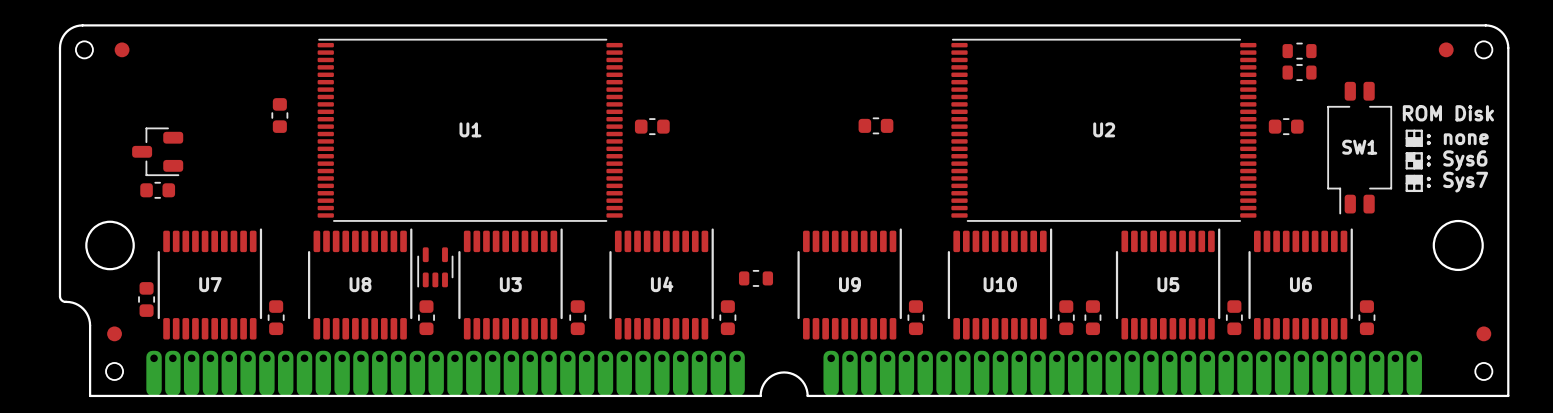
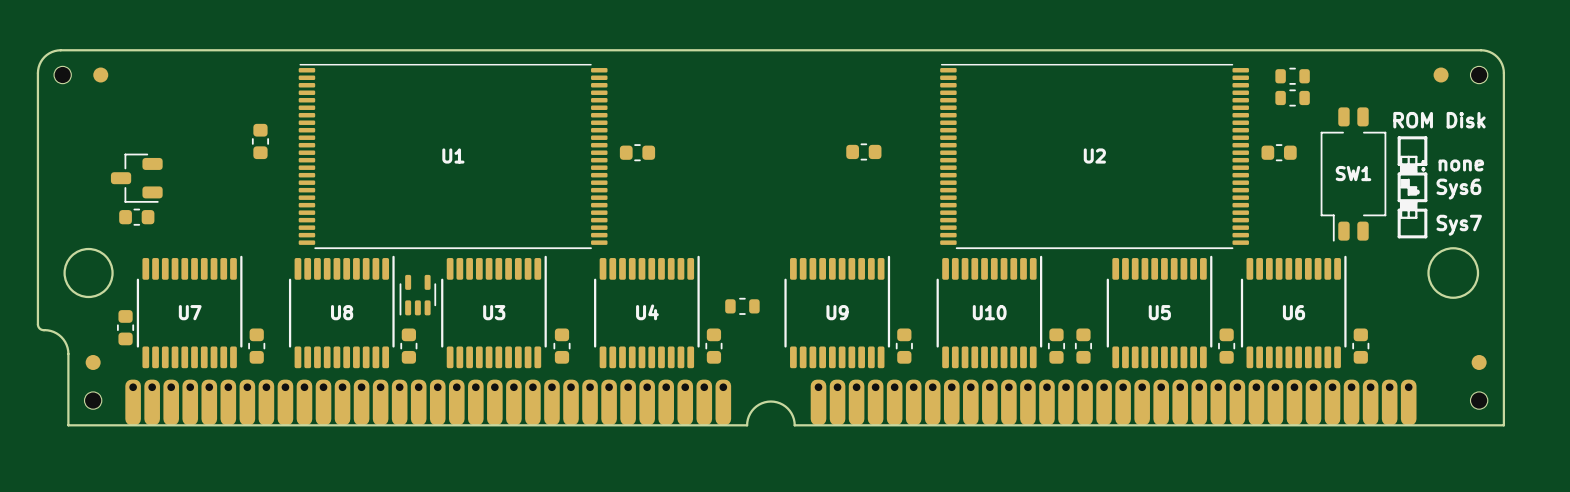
text position: ROM Disk (1448, 113) -> ROM Disk (1439, 120)
line: none -> (1401, 164) (1399, 164) (1399, 137) (1425, 137) (1425, 164) (1416, 164)
line: none -> (1399, 174) (1425, 174) (1425, 200) (1399, 200) (1399, 174)
line: (1406, 153) (1406, 168) (1421, 168) (1421, 153) (1406, 153) -> none
text: : Sys6 (1457, 160) -> Sys6 (1458, 189)
text: : Sys7 (1457, 182) -> Sys7 (1459, 225)
line: none -> (1401, 210) (1399, 210) (1399, 236) (1425, 236) (1425, 210) (1416, 210)

